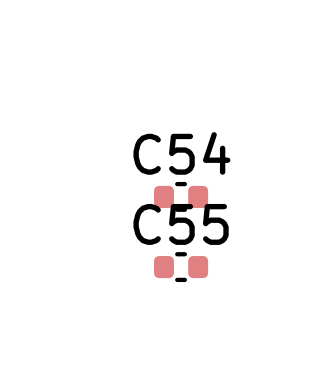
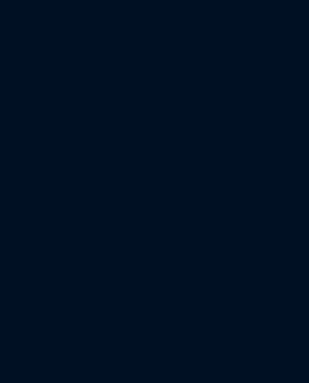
C54: (181, 196) -> none
C55: (181, 267) -> none

